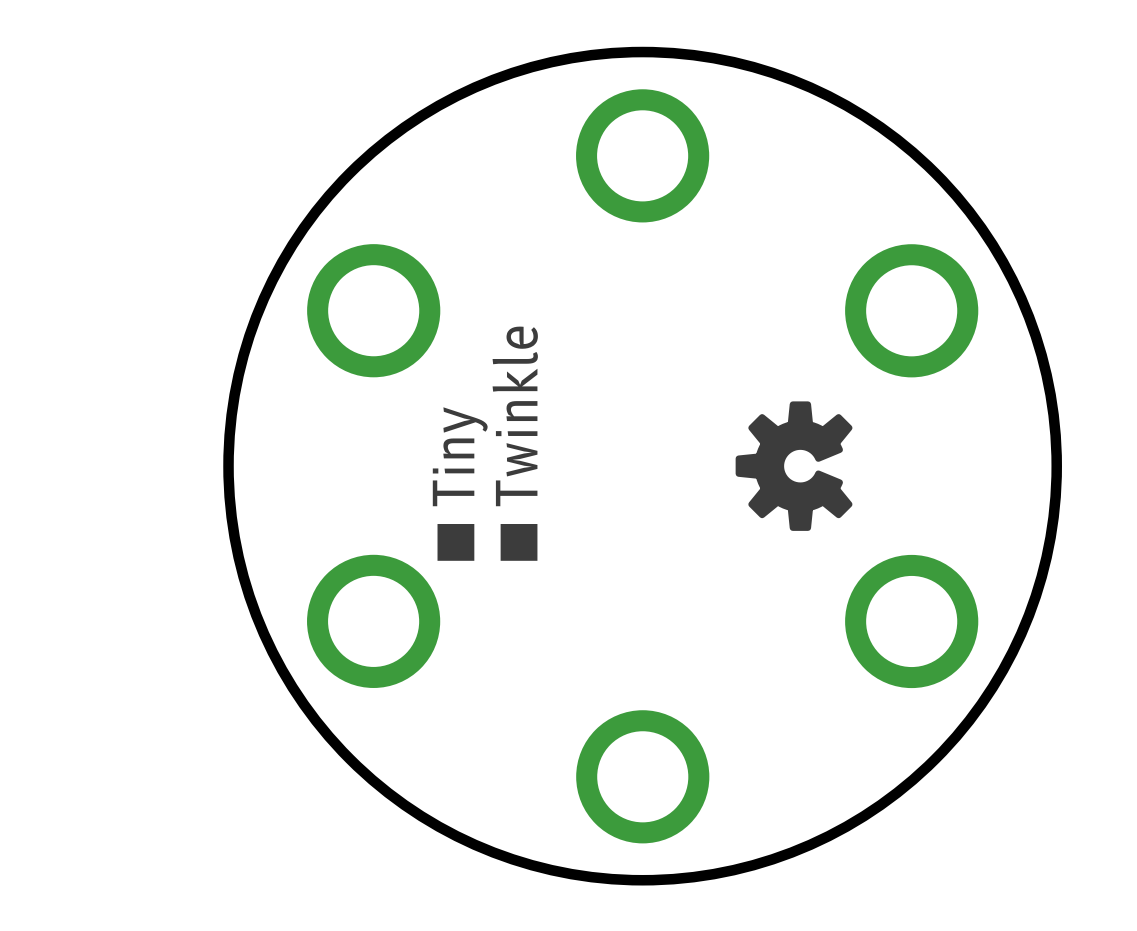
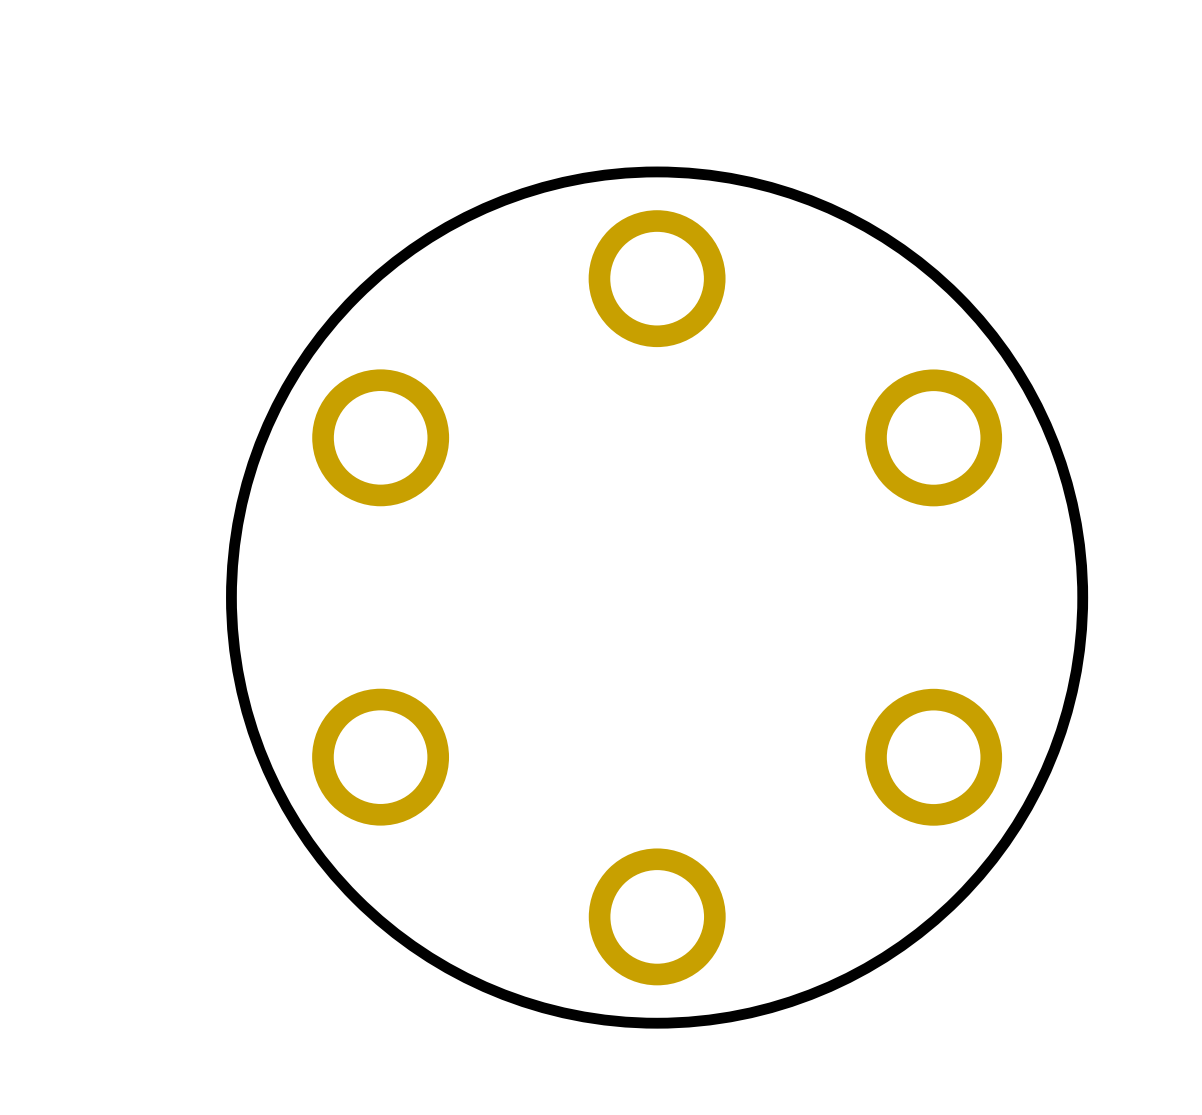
drawing: [735, 401, 853, 531] -> none
text: Twinkle (515, 416) -> none
text: Tiny (460, 456) -> none
drawing: [437, 523, 538, 561] -> none

